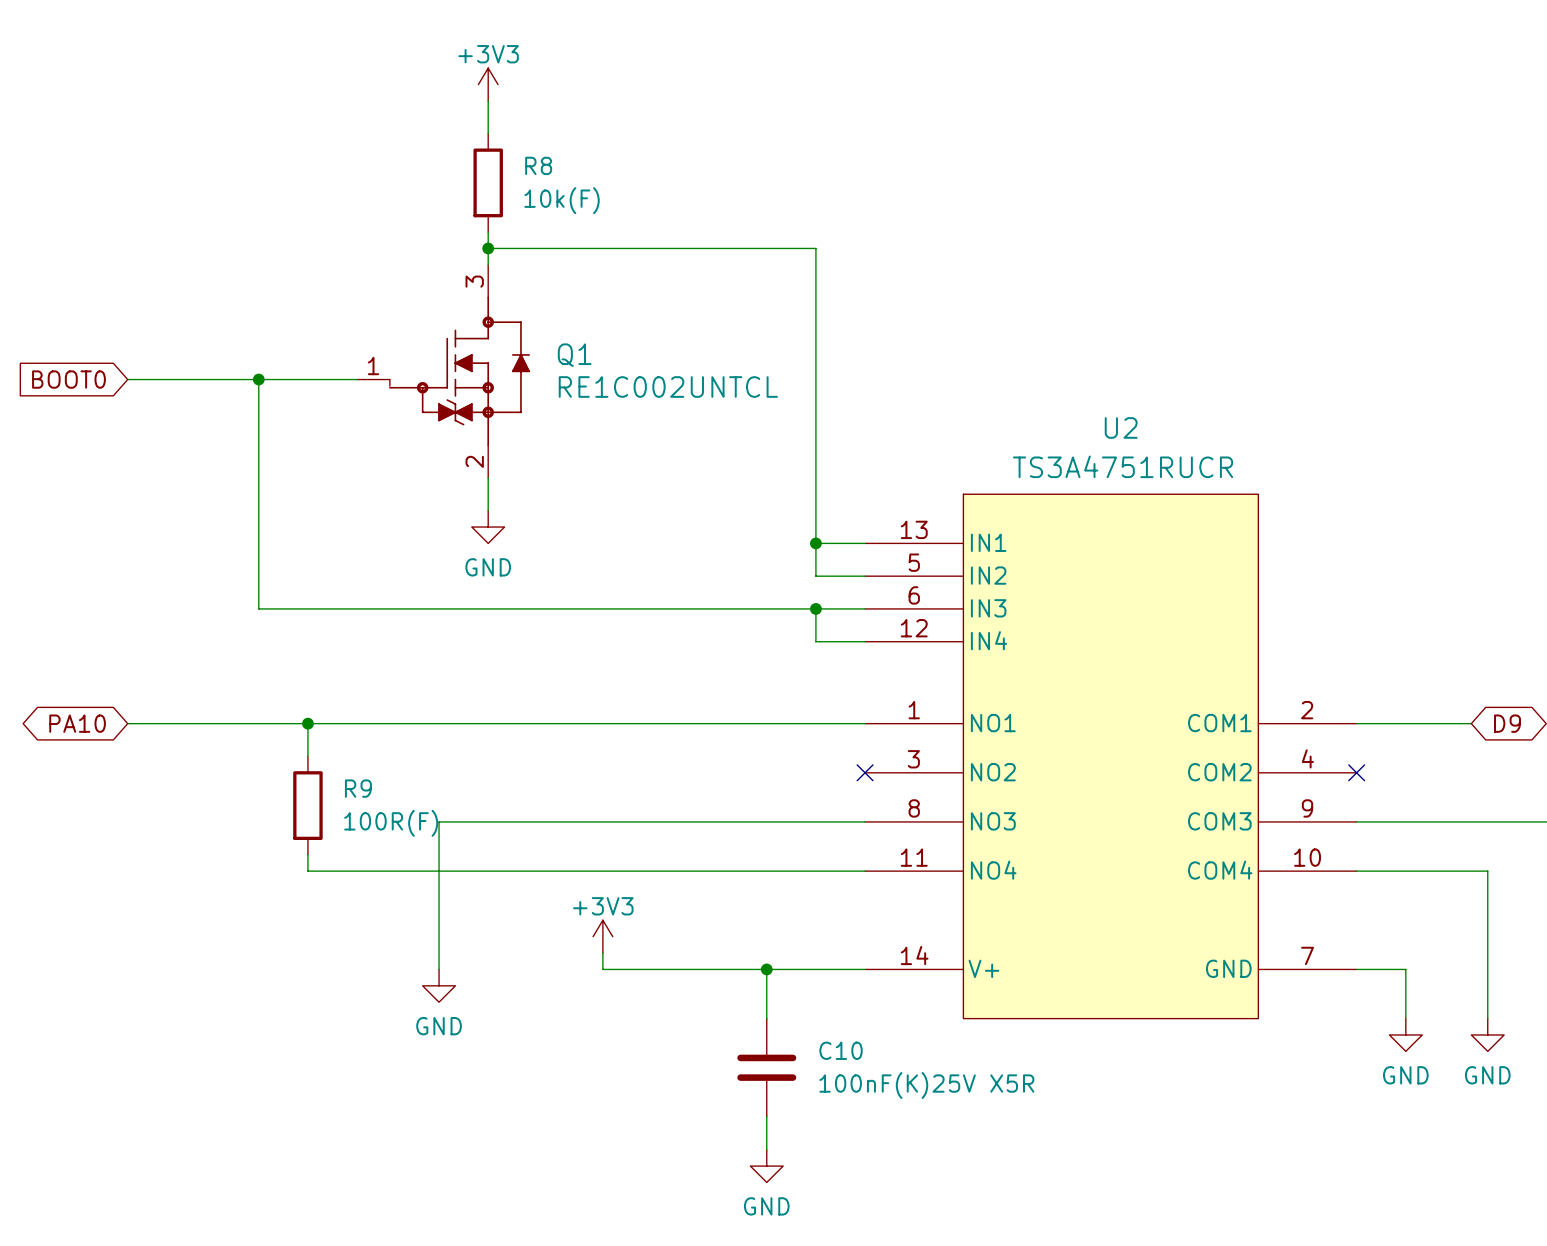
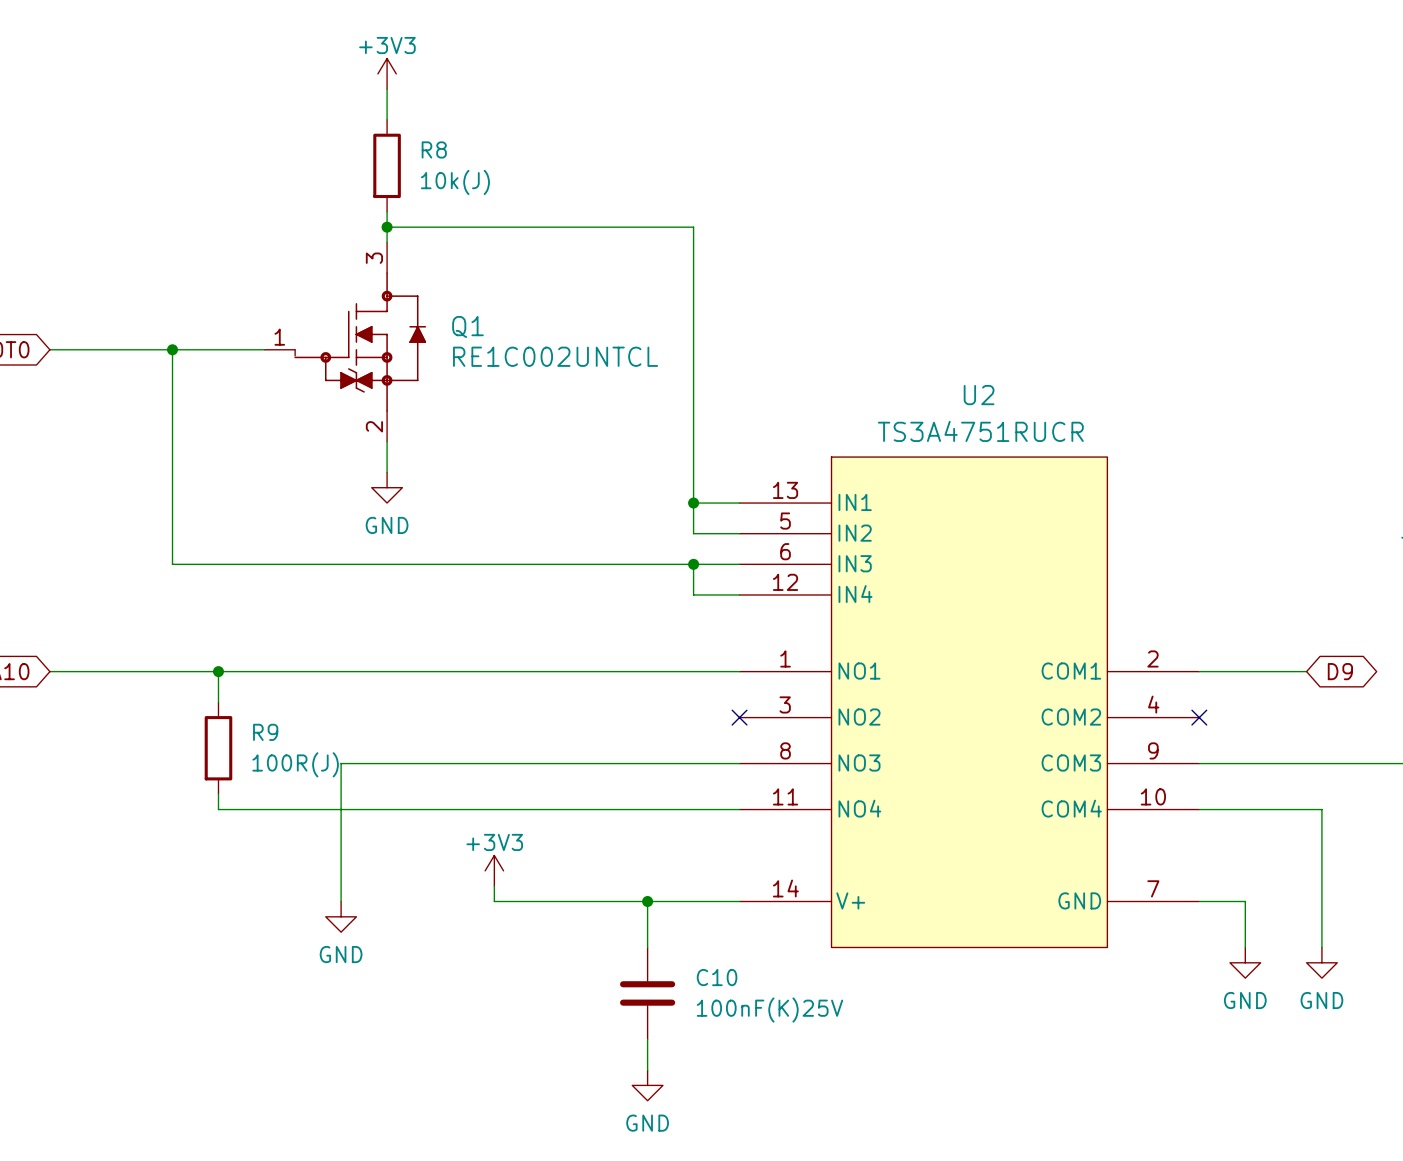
R8 value: 10k(F) (562, 200) -> 10k(J) (455, 182)
R9 value: 100R(F) (391, 823) -> 100R(J) (295, 764)
C10 value: 100nF(K)25V X5R (926, 1085) -> 100nF(K)25V (769, 1010)

